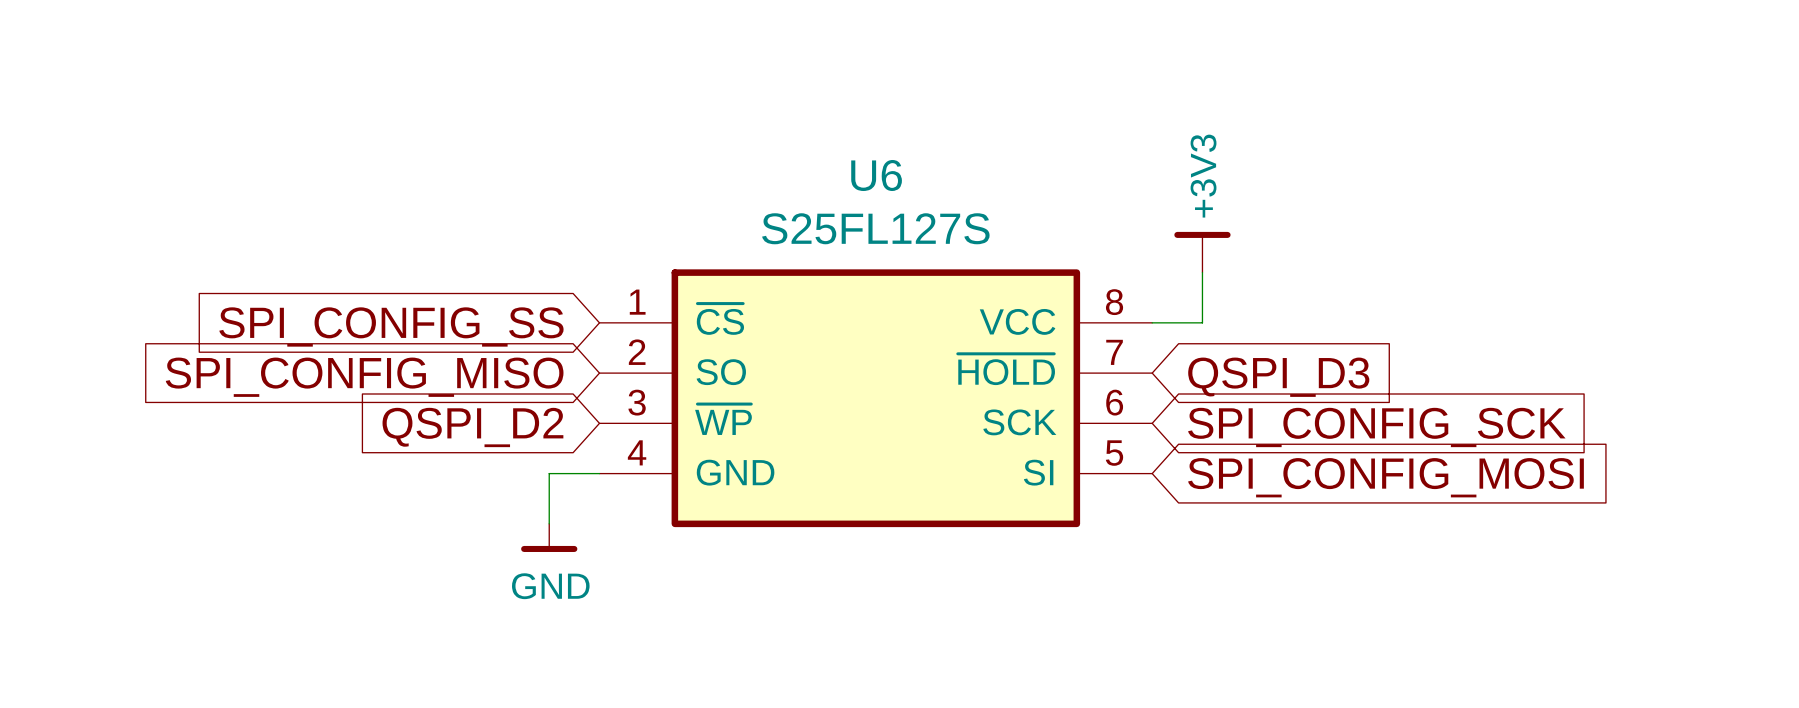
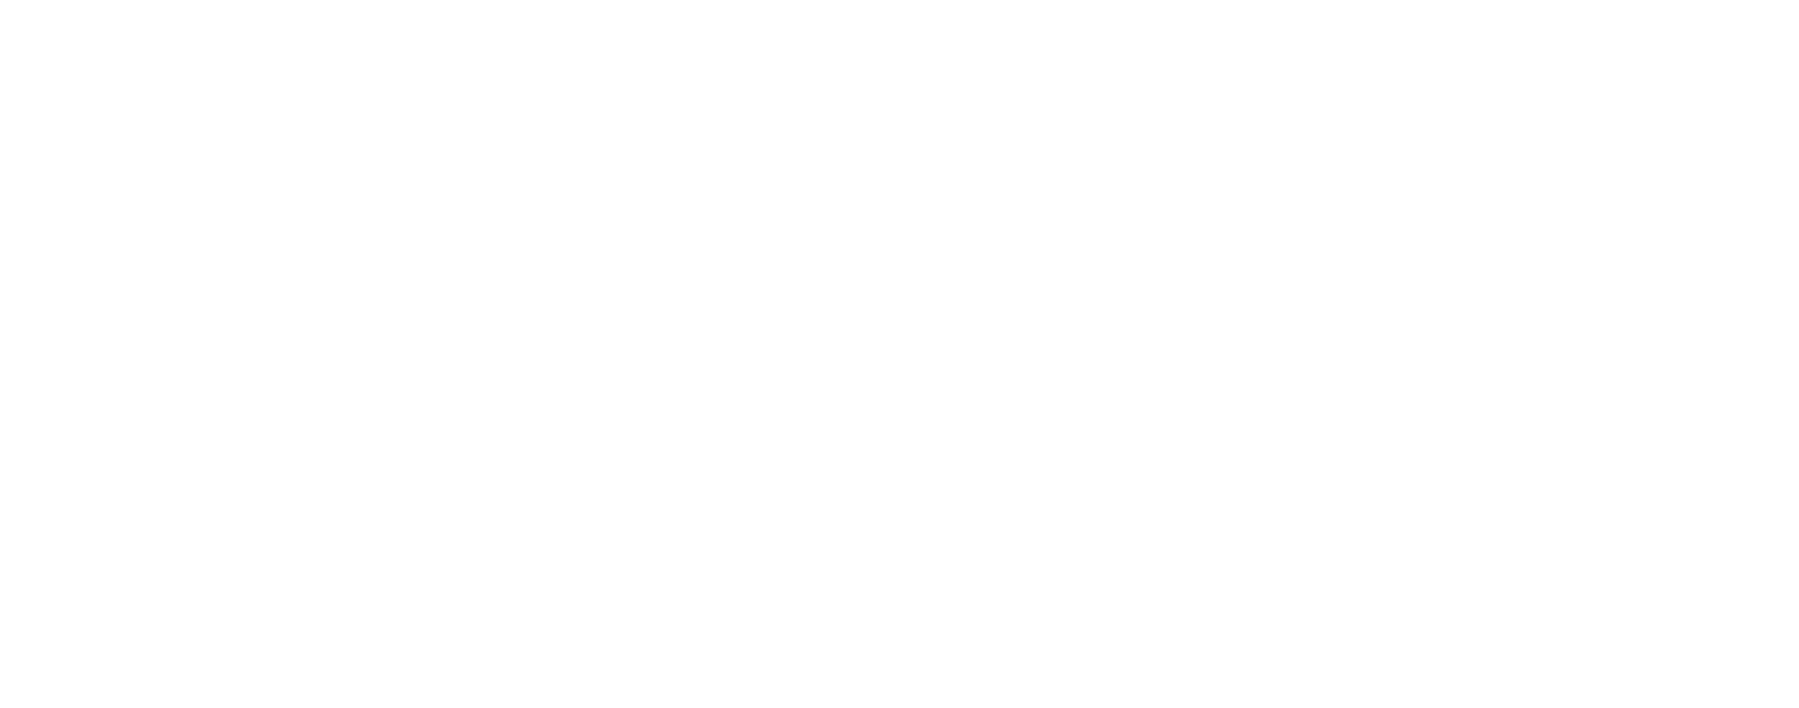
power symbol: +3V3 (1202, 252) -> none
wire: (1202, 272) (1202, 322) (1152, 322) -> none
global label: SPI_CONFIG_SS (391, 326) -> none
global label: SPI_CONFIG_MISO (364, 377) -> none
global label: QSPI_D3 (1278, 377) -> none
U6: S25FL127S (875, 398) -> none
global label: QSPI_D2 (472, 427) -> none
global label: SPI_CONFIG_SCK (1376, 427) -> none
wire: (599, 473) (549, 473) (549, 523) -> none
global label: SPI_CONFIG_MOSI (1385, 477) -> none
power symbol: GND (549, 537) -> none

